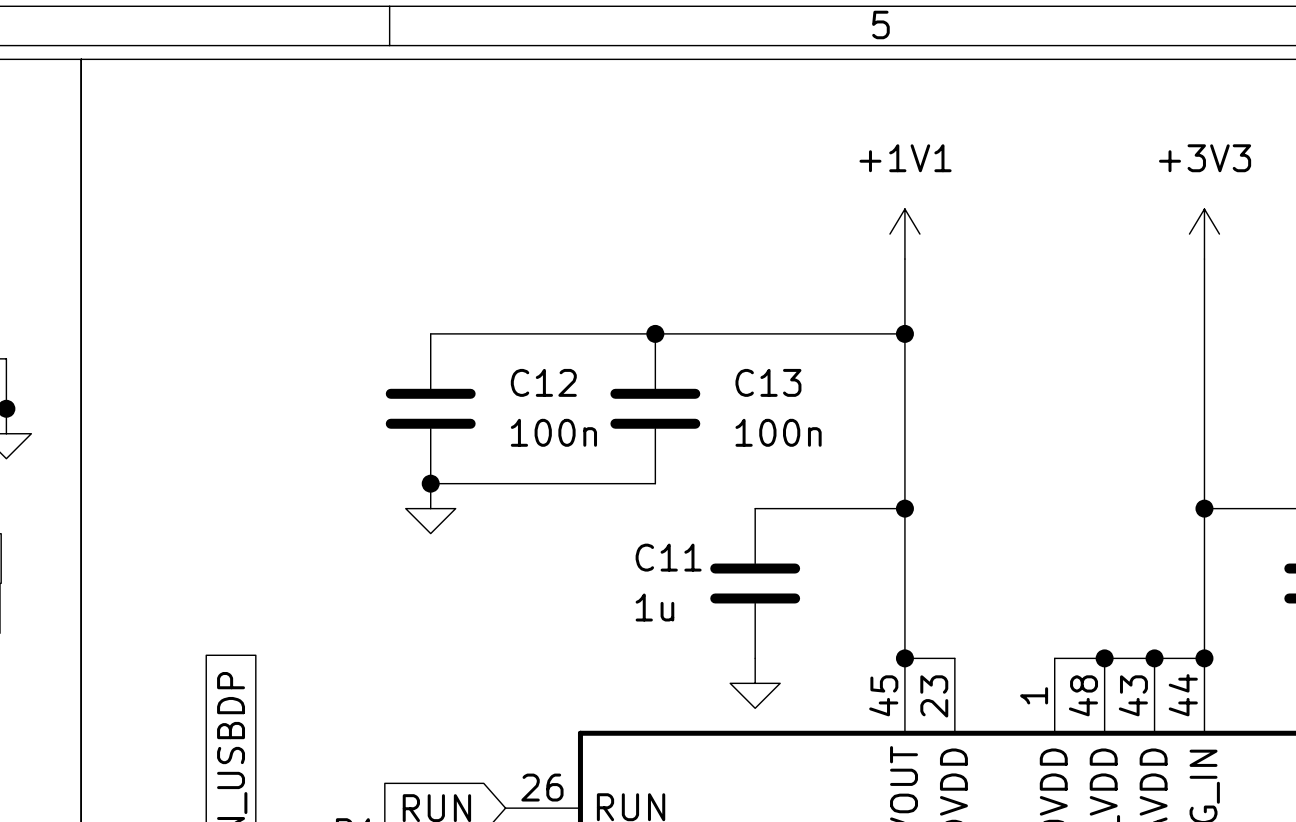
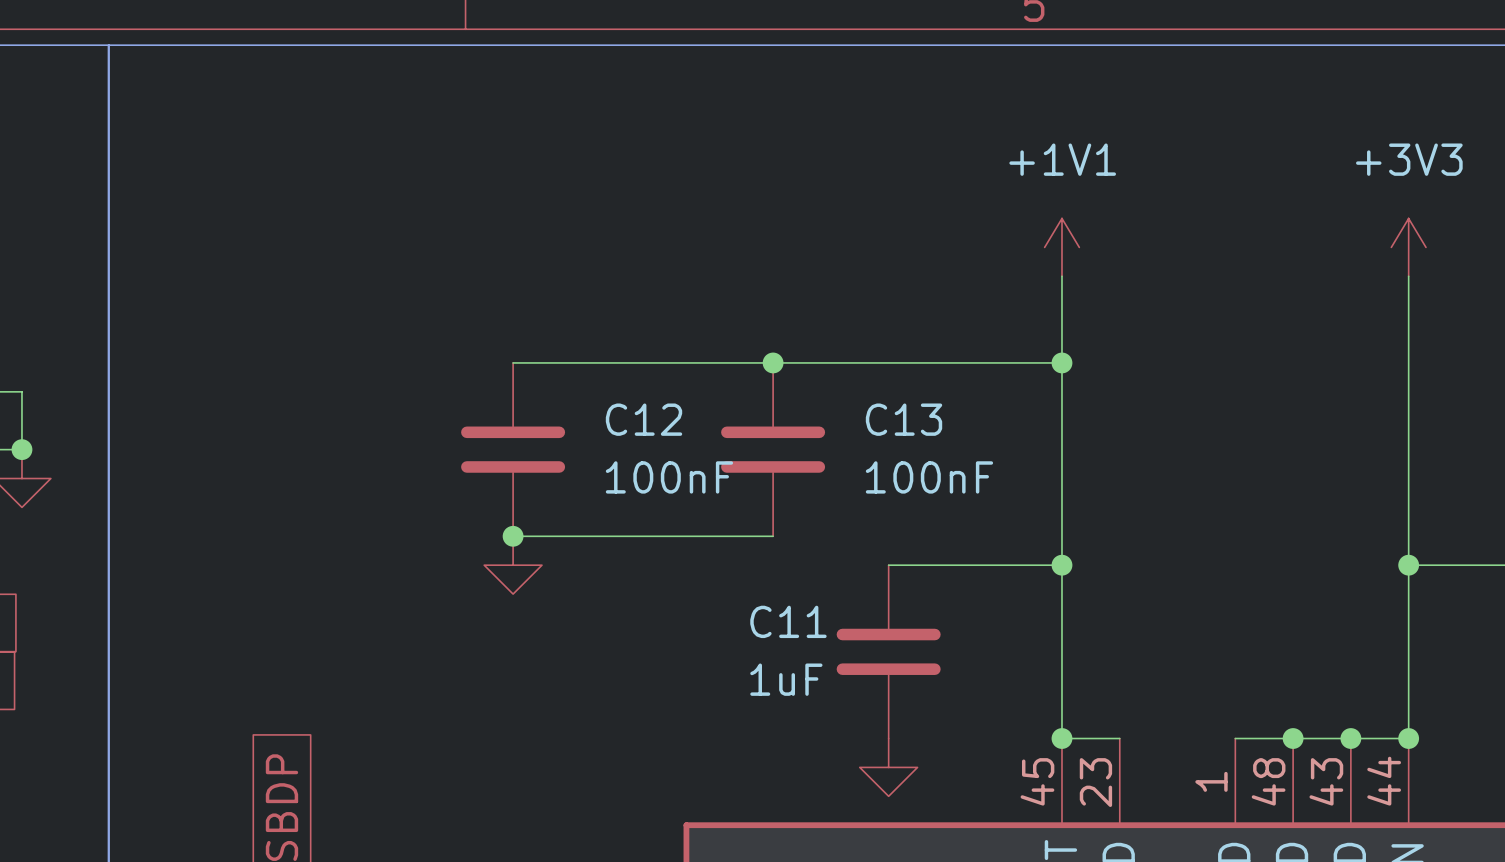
C12 value: 100n (553, 432) -> 100nF (669, 477)
C13 value: 100n (778, 432) -> 100nF (929, 477)
C11 value: 1u (654, 607) -> 1uF (786, 679)

